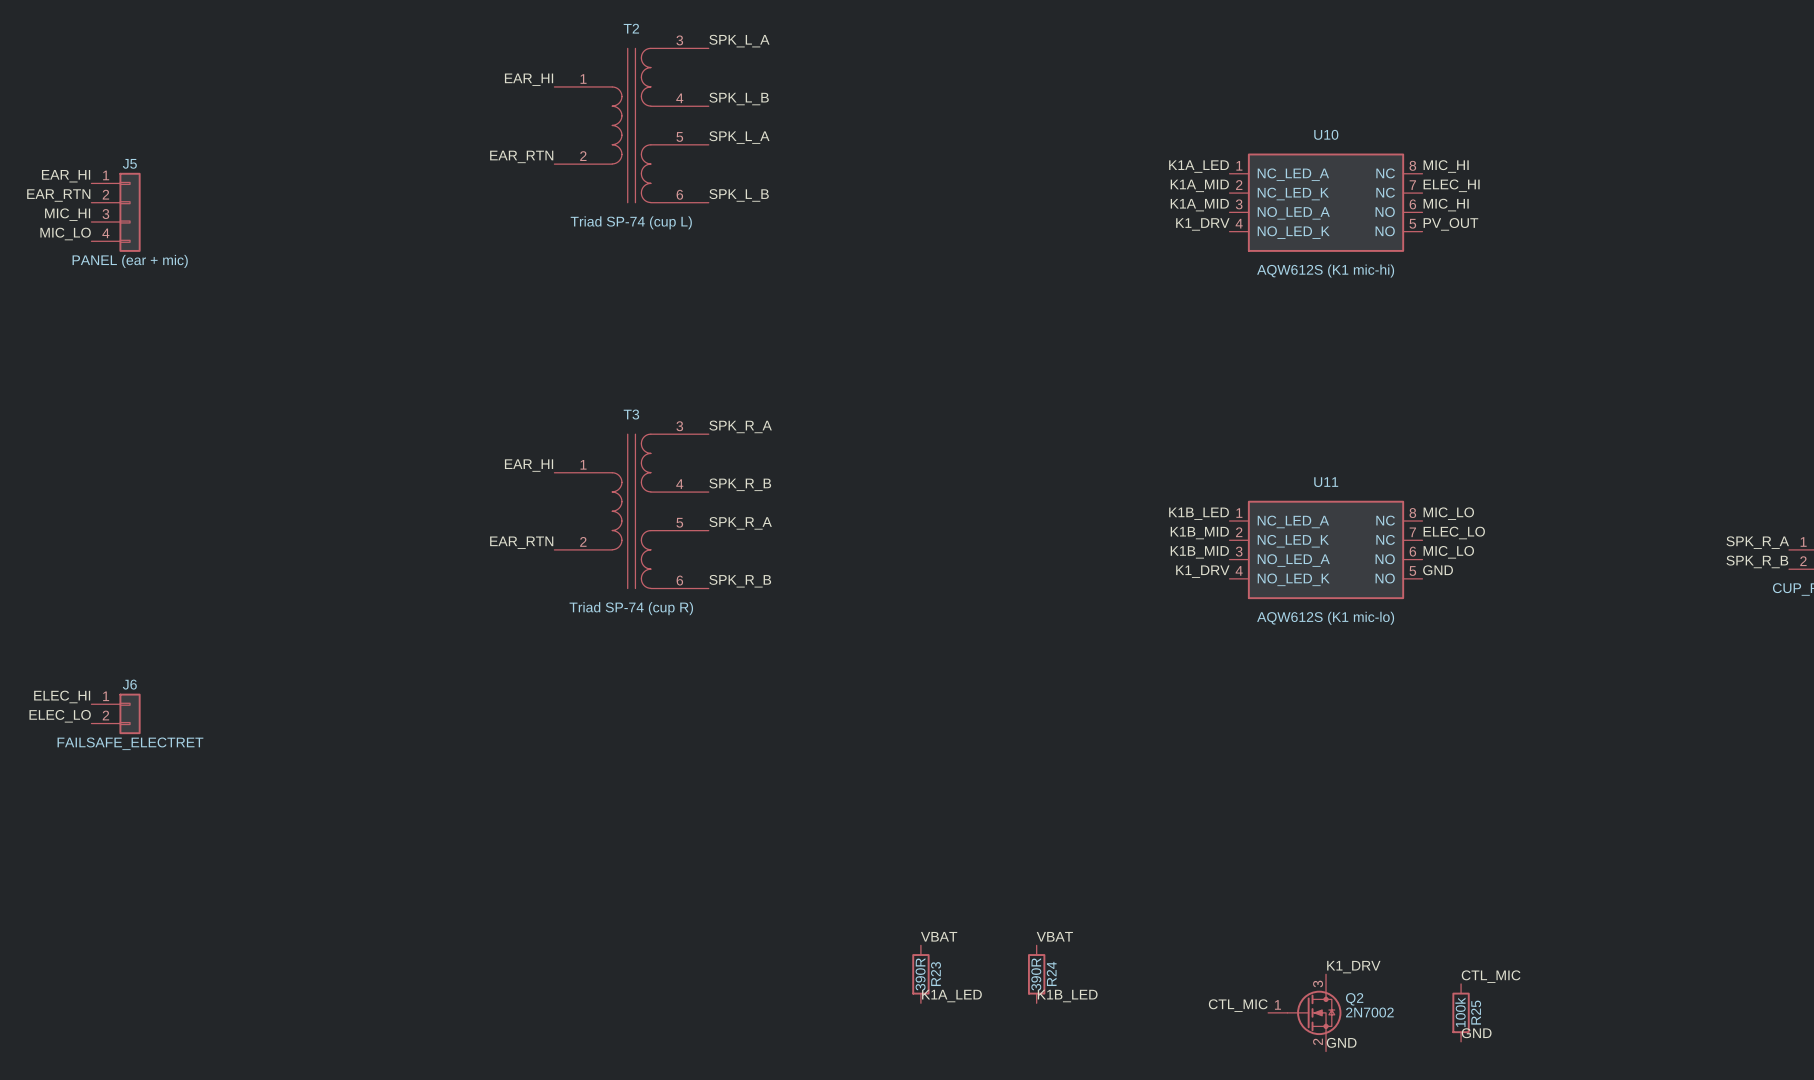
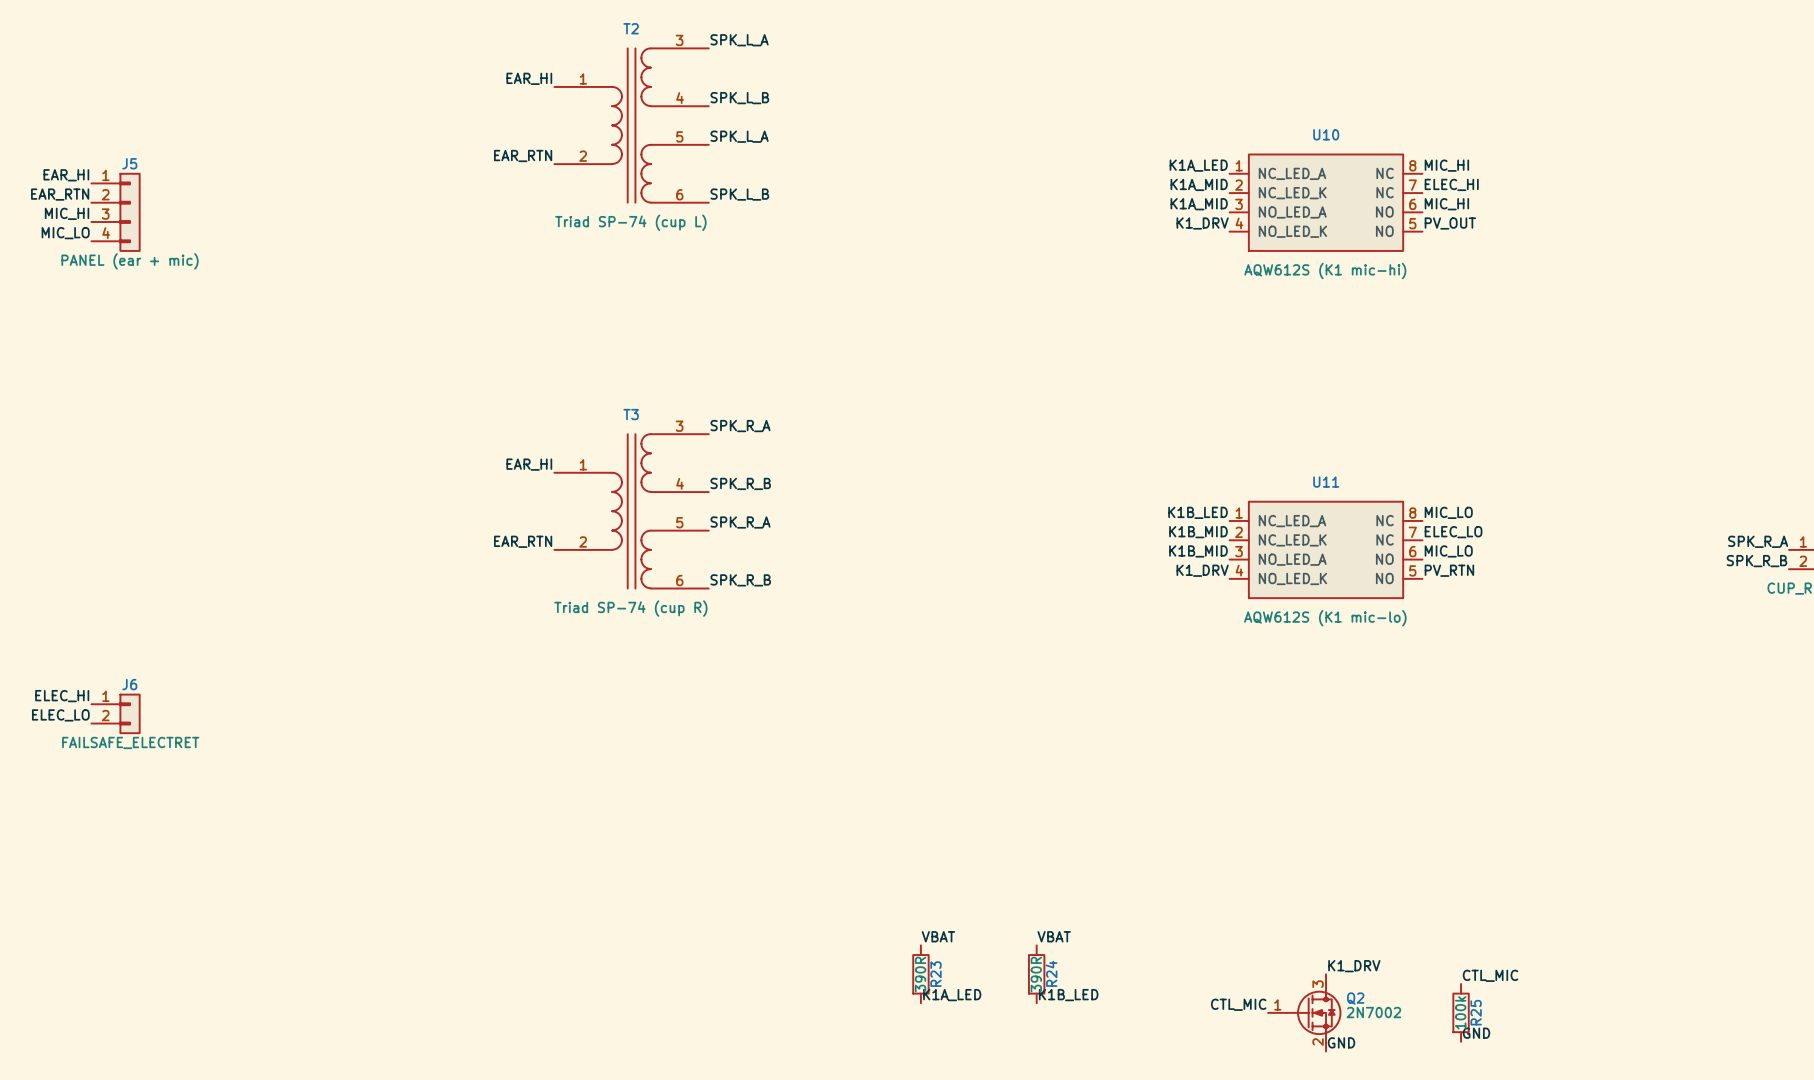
label: GND (1438, 570) -> PV_RTN (1449, 570)

